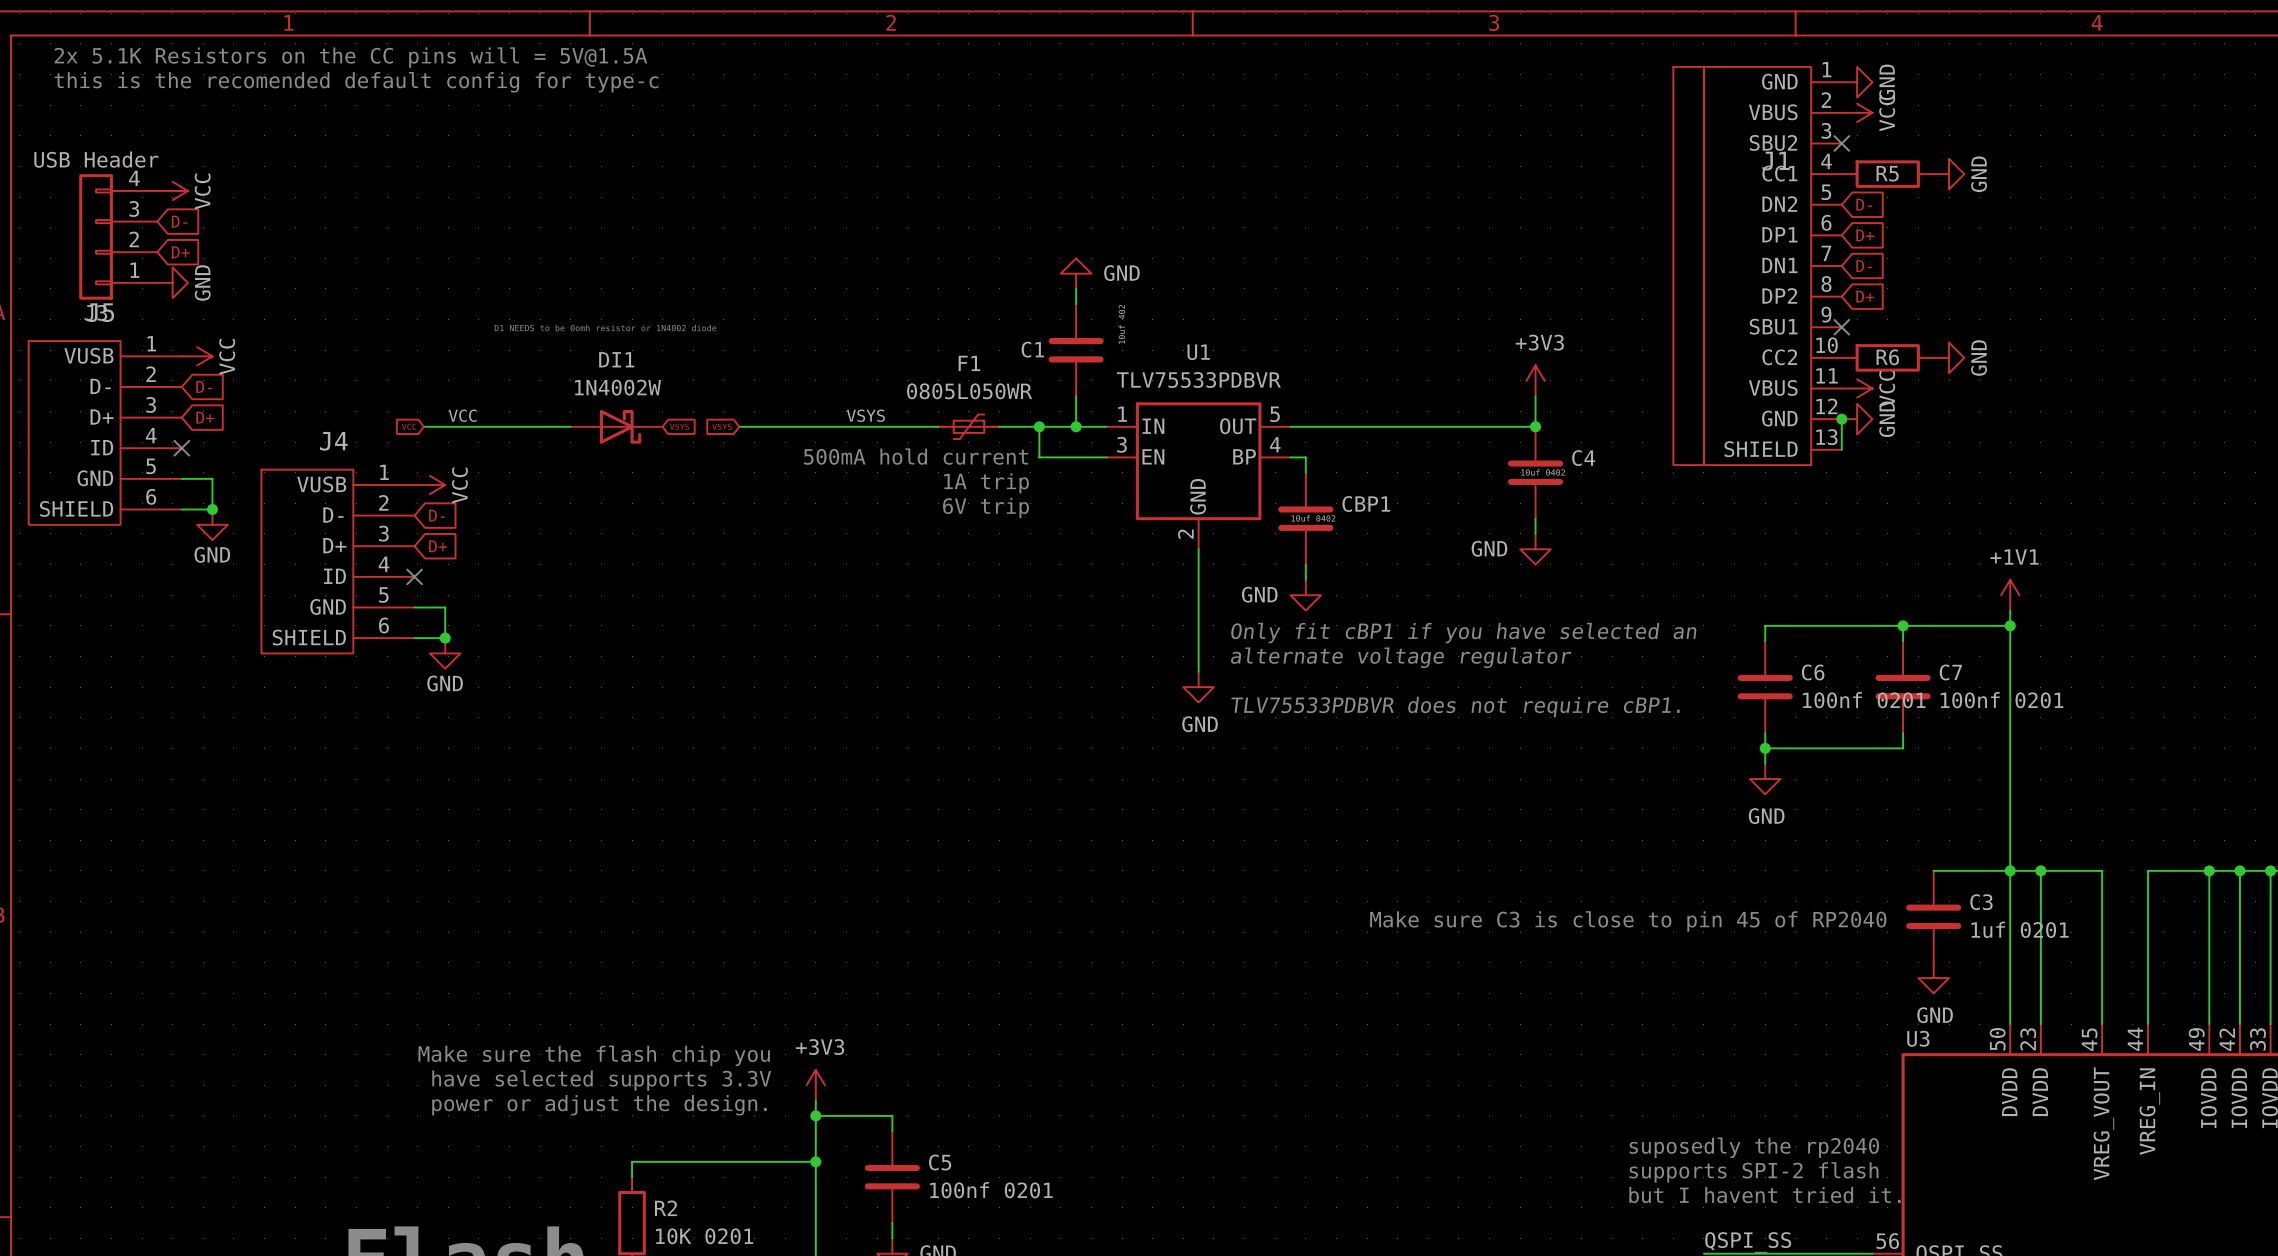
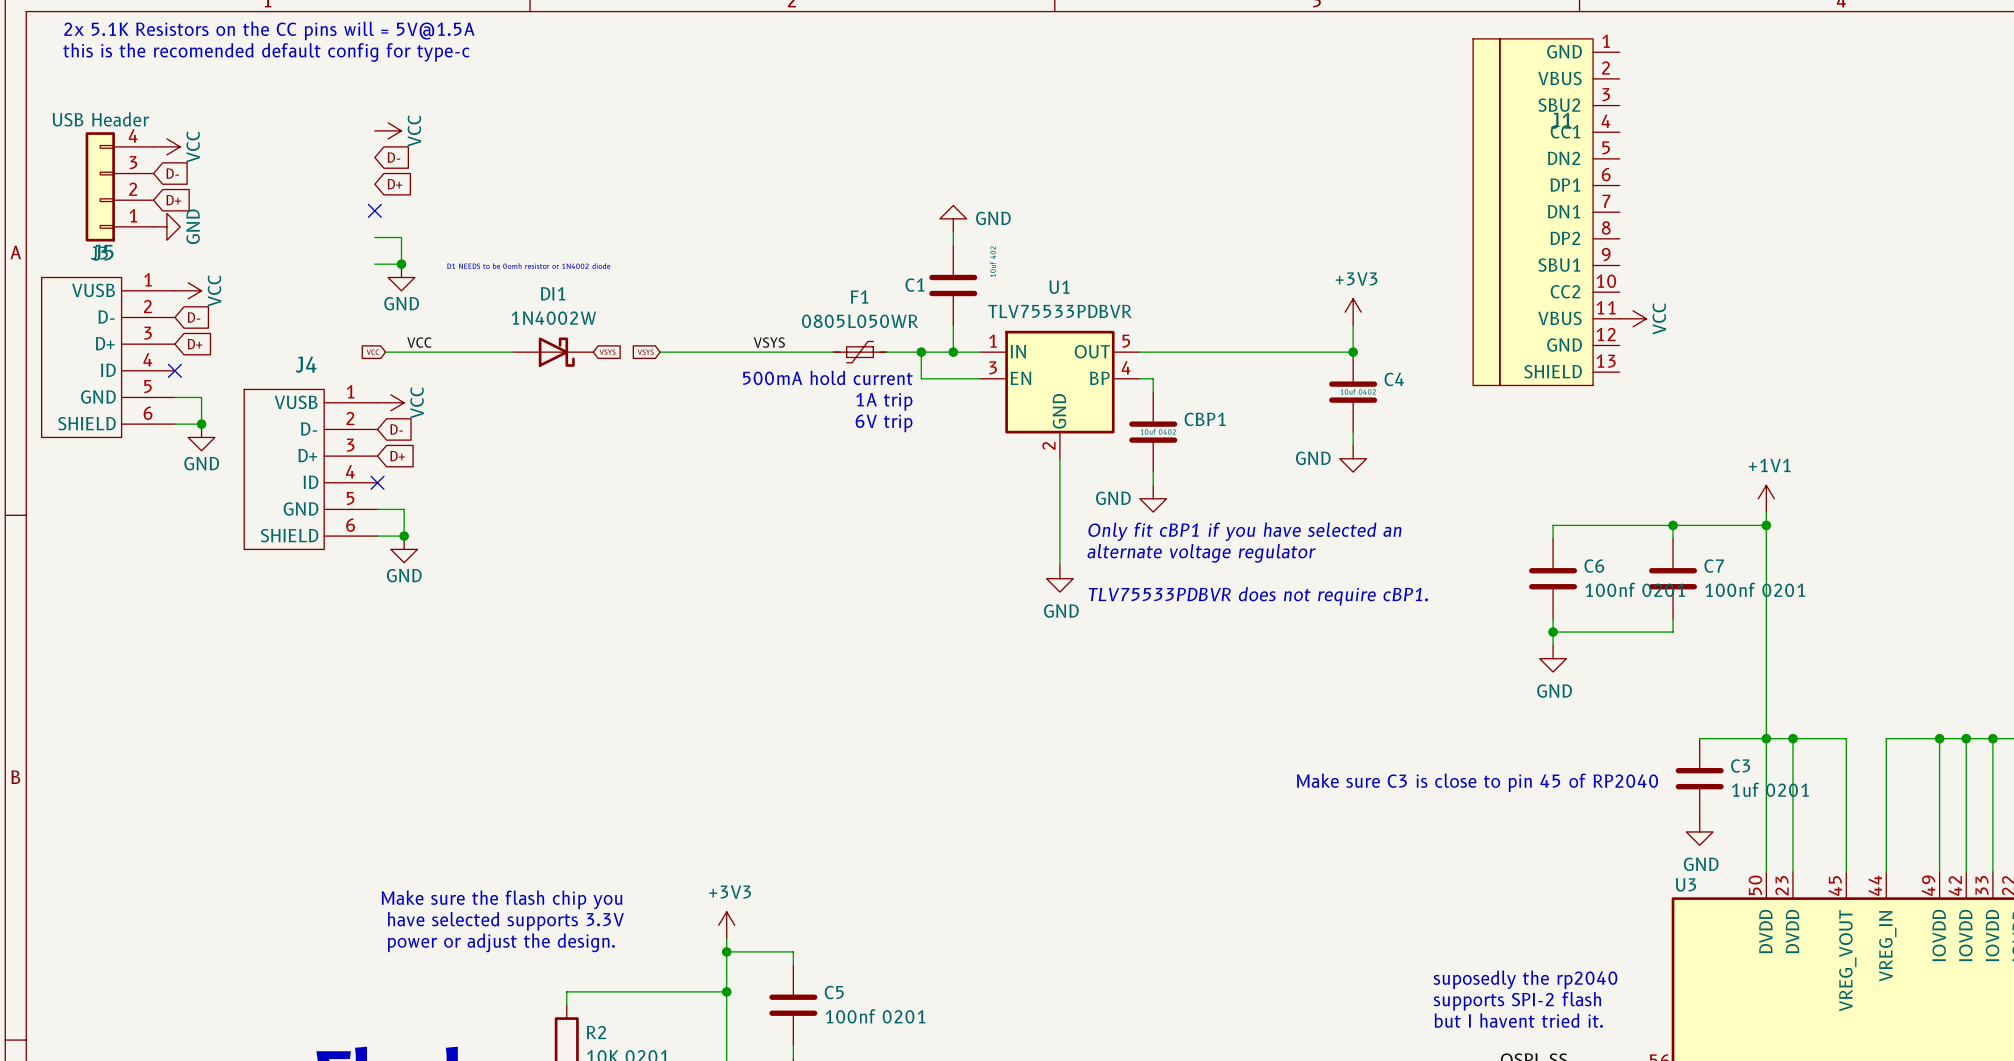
power symbol: GND (1857, 82) -> none
power symbol: VCC (1857, 112) -> none
no-connect mark: (1841, 143) -> none
power symbol: none -> VCC (388, 130)
R5: (1887, 174) -> none
power symbol: GND (1949, 174) -> none
global label: none -> D- (393, 157)
global label: D- (1864, 204) -> none
global label: none -> D+ (394, 184)
global label: D+ (1865, 235) -> none
no-connect mark: none -> (374, 210)
global label: D- (1864, 266) -> none
wire: none -> (374, 237) (401, 237) (401, 264) (374, 264)
global label: D+ (1865, 296) -> none
junction: none -> (401, 264)
no-connect mark: (1841, 327) -> none
power symbol: none -> GND (401, 277)
R6: (1887, 357) -> none
power symbol: GND (1949, 357) -> none
wire: (1841, 419) (1841, 449) -> none
junction: (1841, 419) -> none
power symbol: GND (1857, 419) -> none

